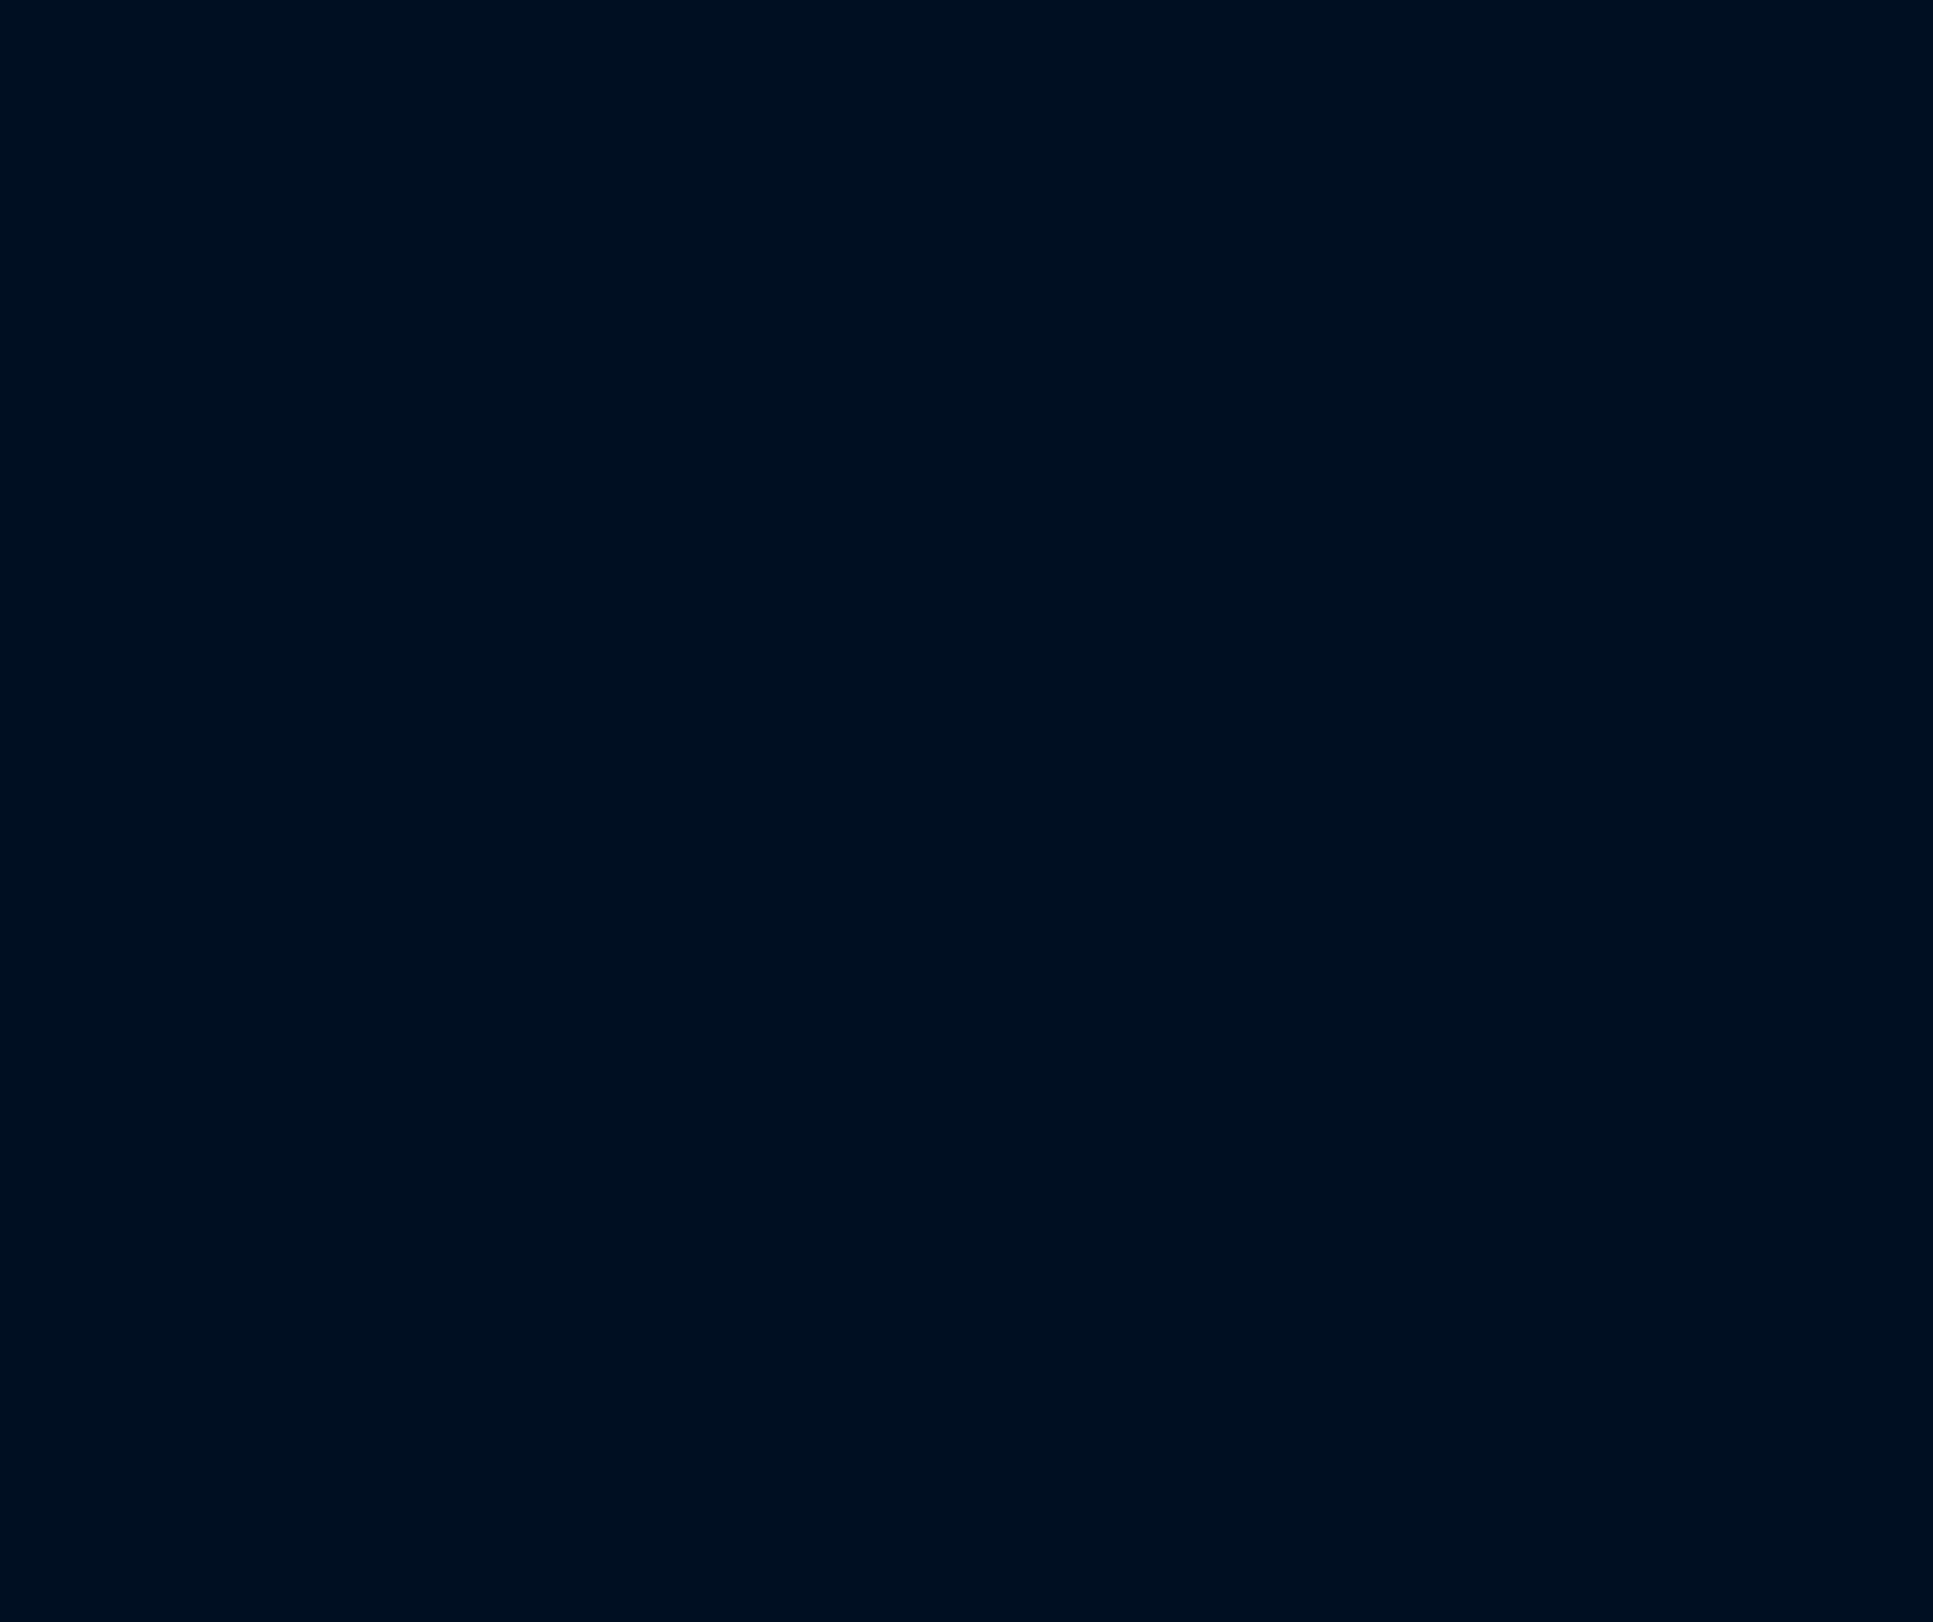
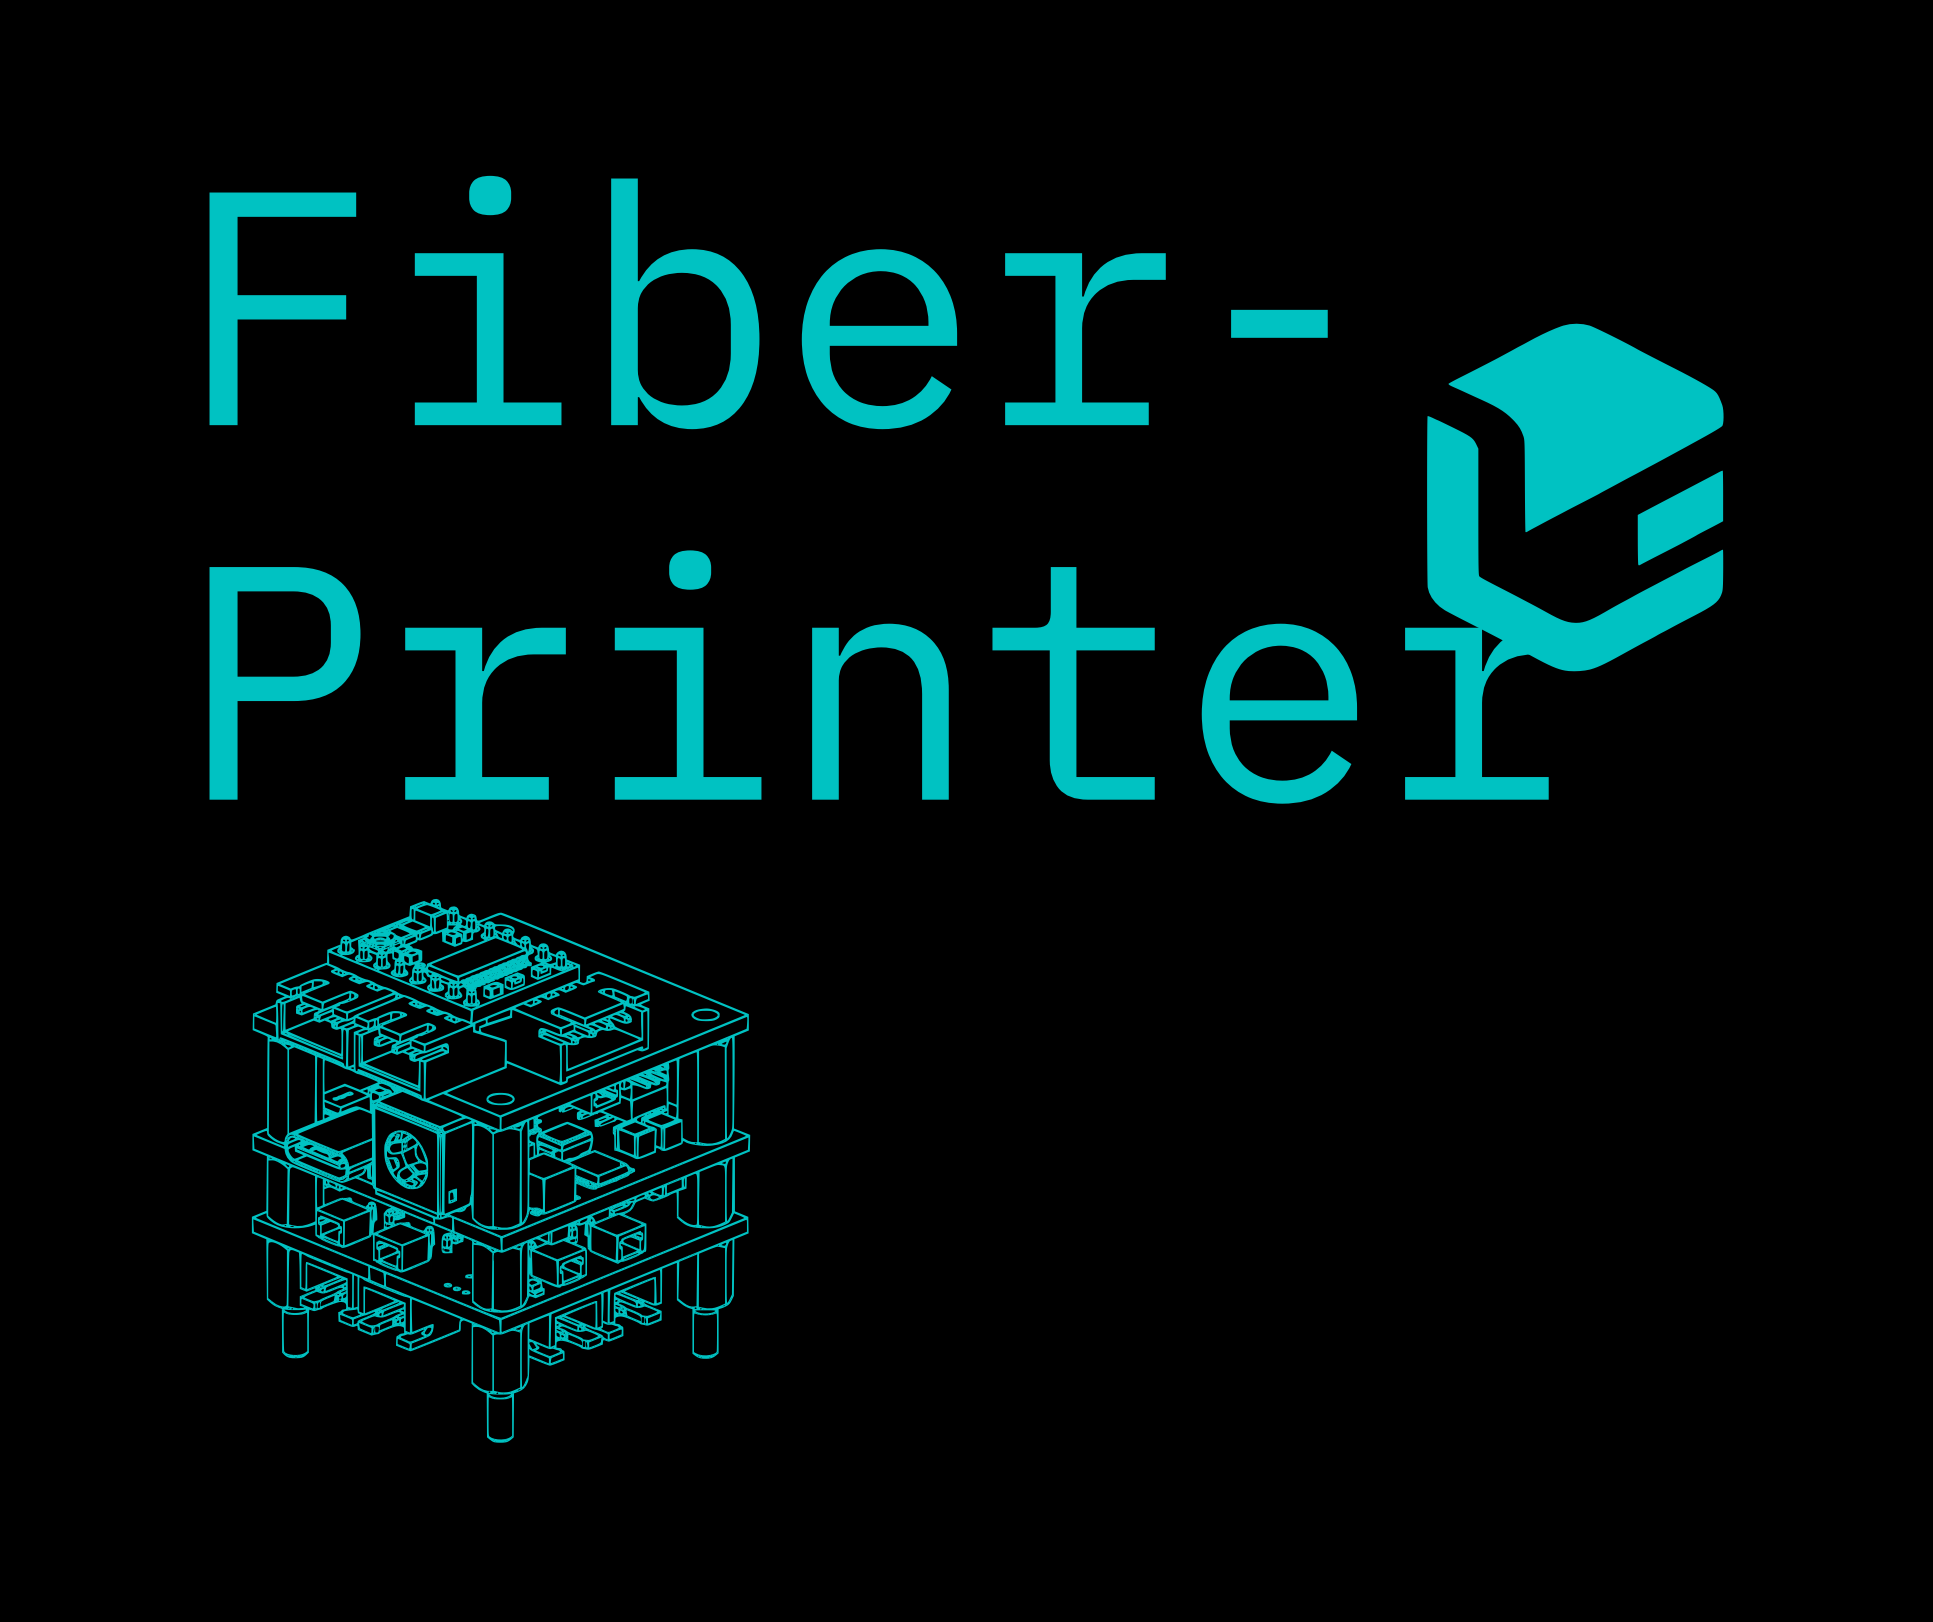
text: none -> Fiber- (768, 302)
drawing: none -> [1427, 323, 1724, 672]
text: none -> Printer (887, 677)
drawing: none -> [251, 898, 751, 1443]

